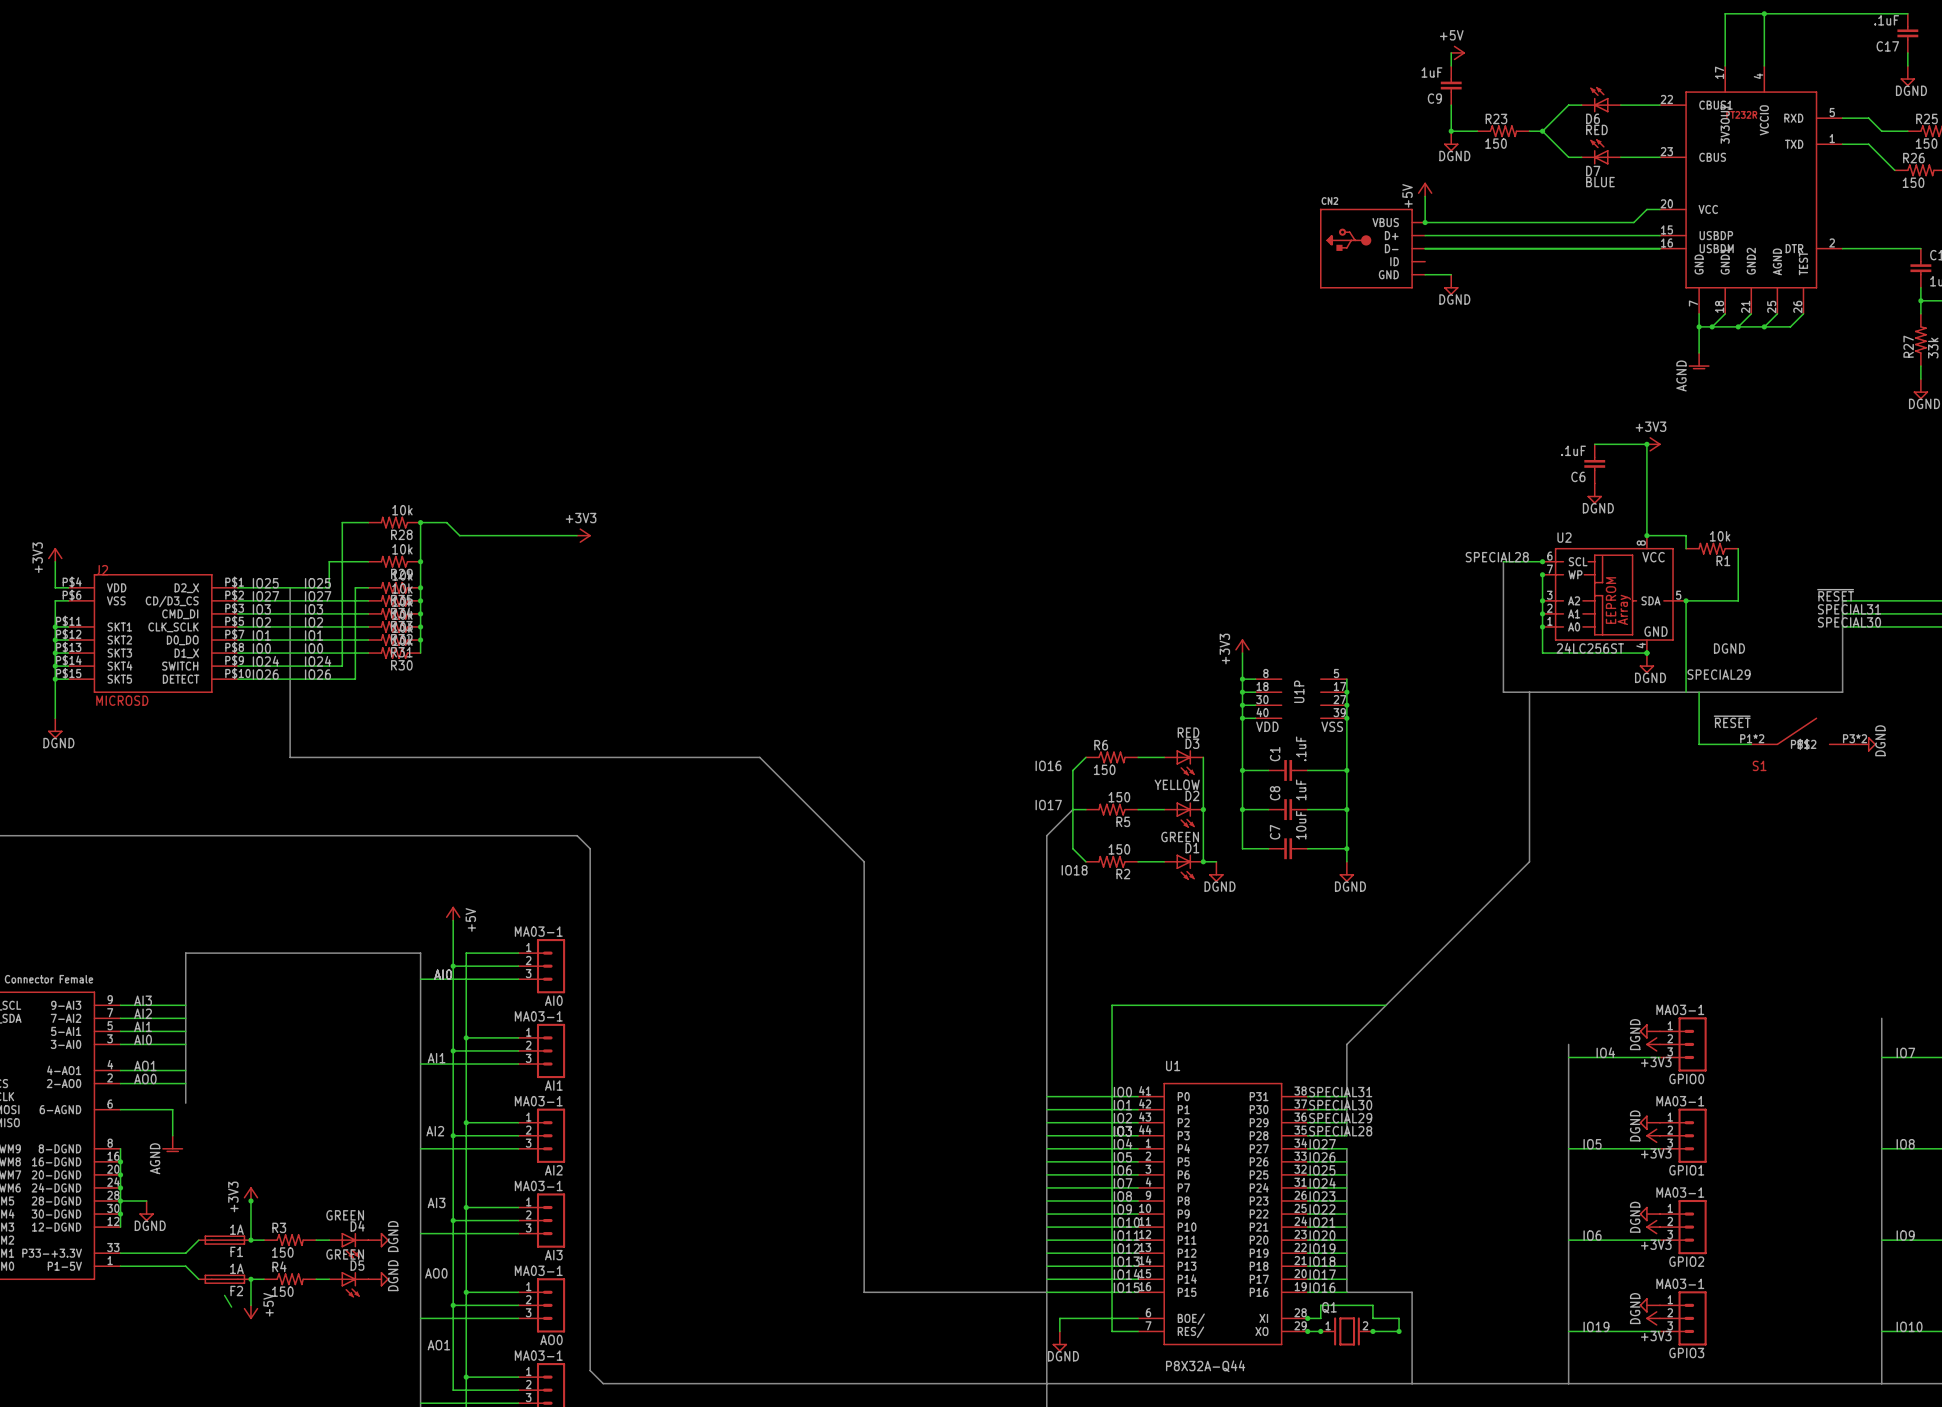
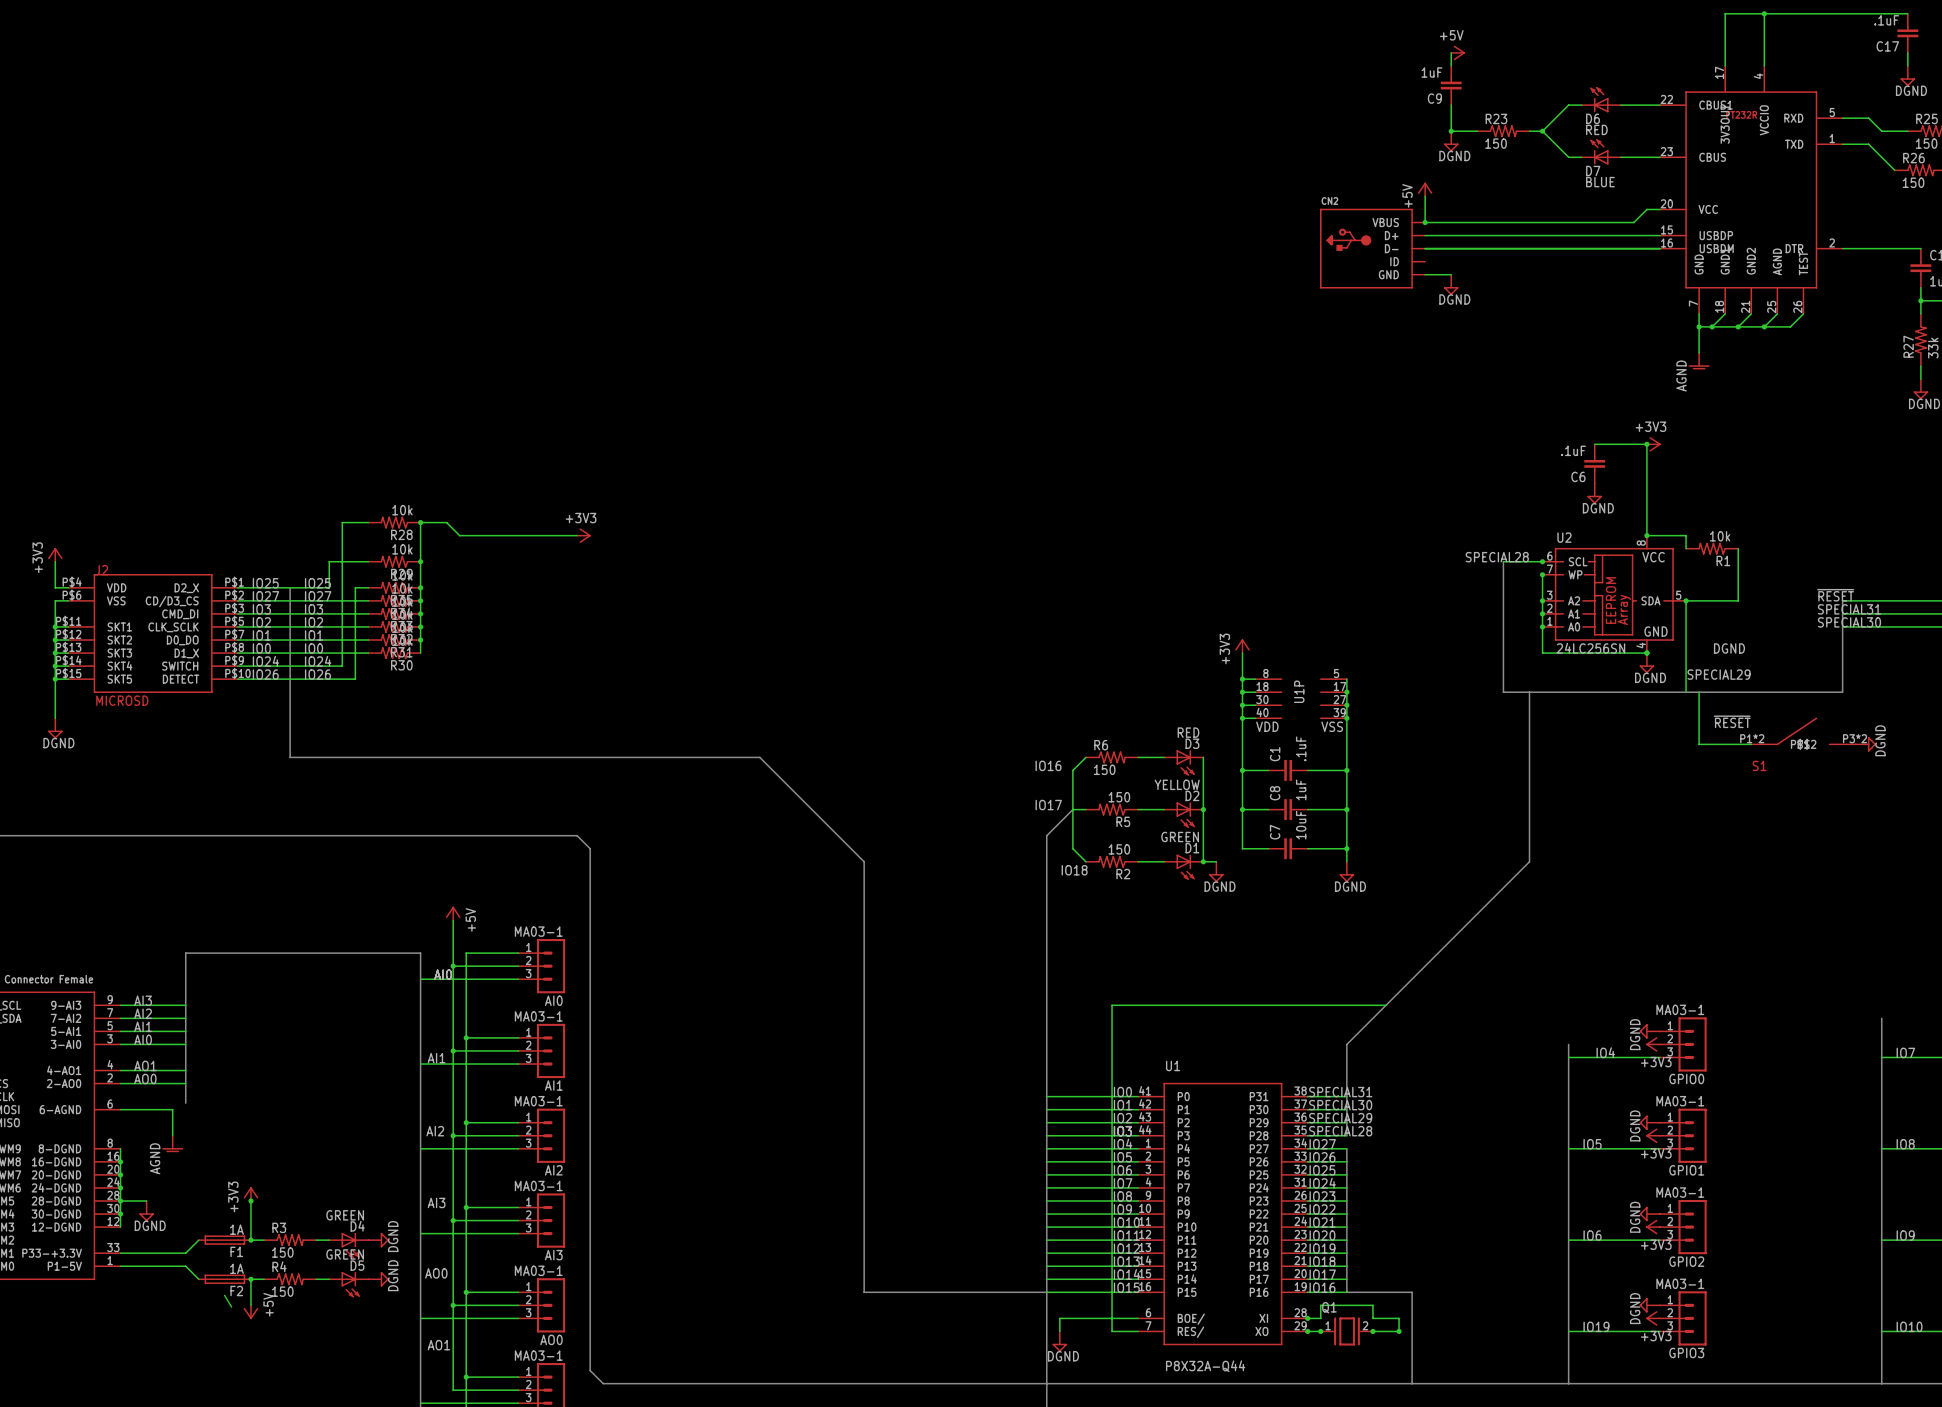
U2 value: 24LC256ST (1590, 648) -> 24LC256SN (1590, 648)

